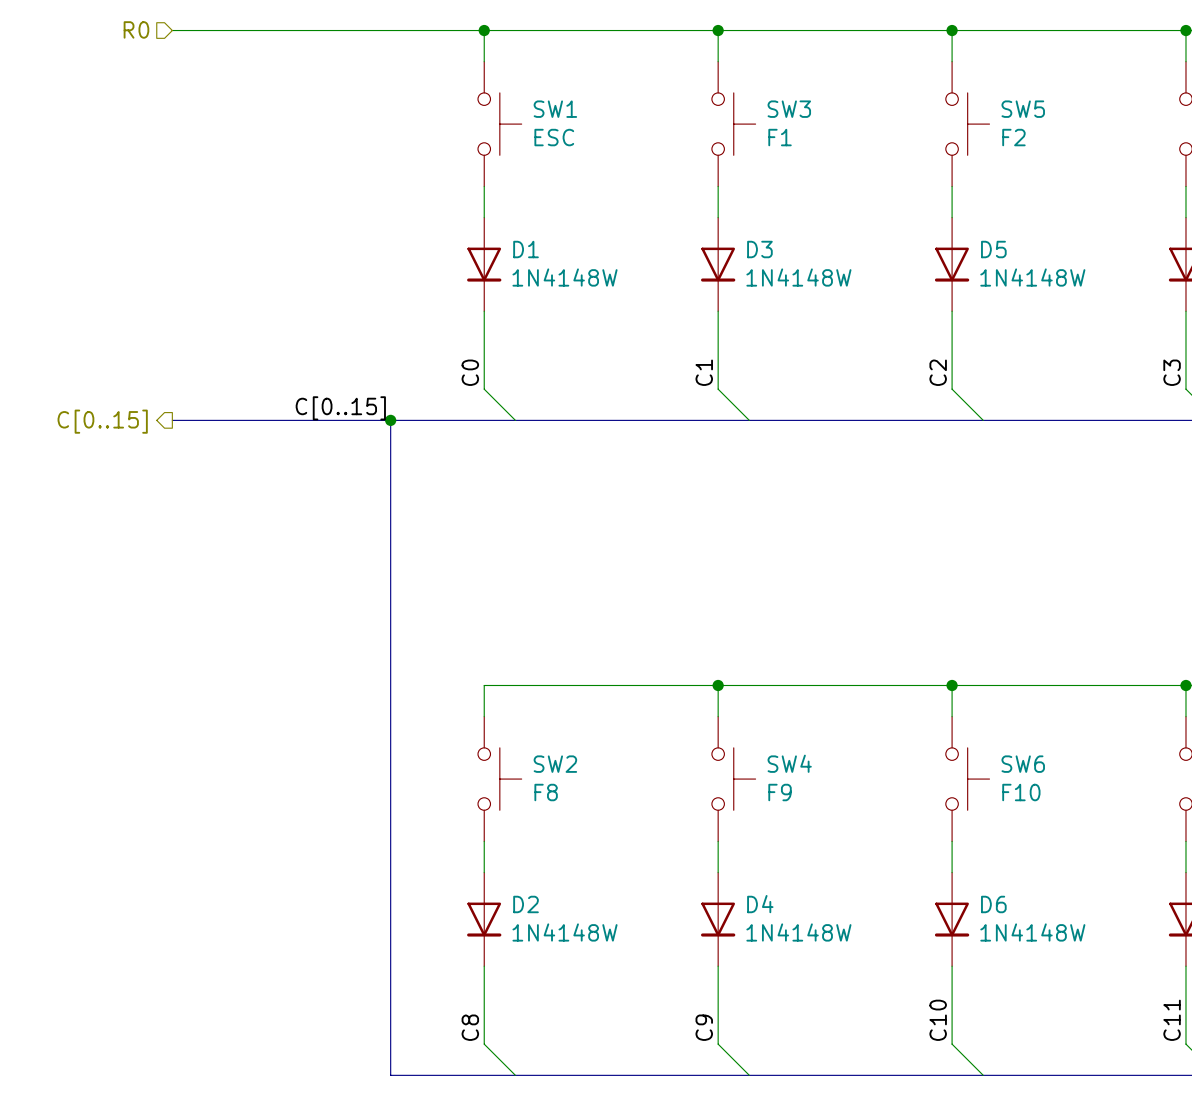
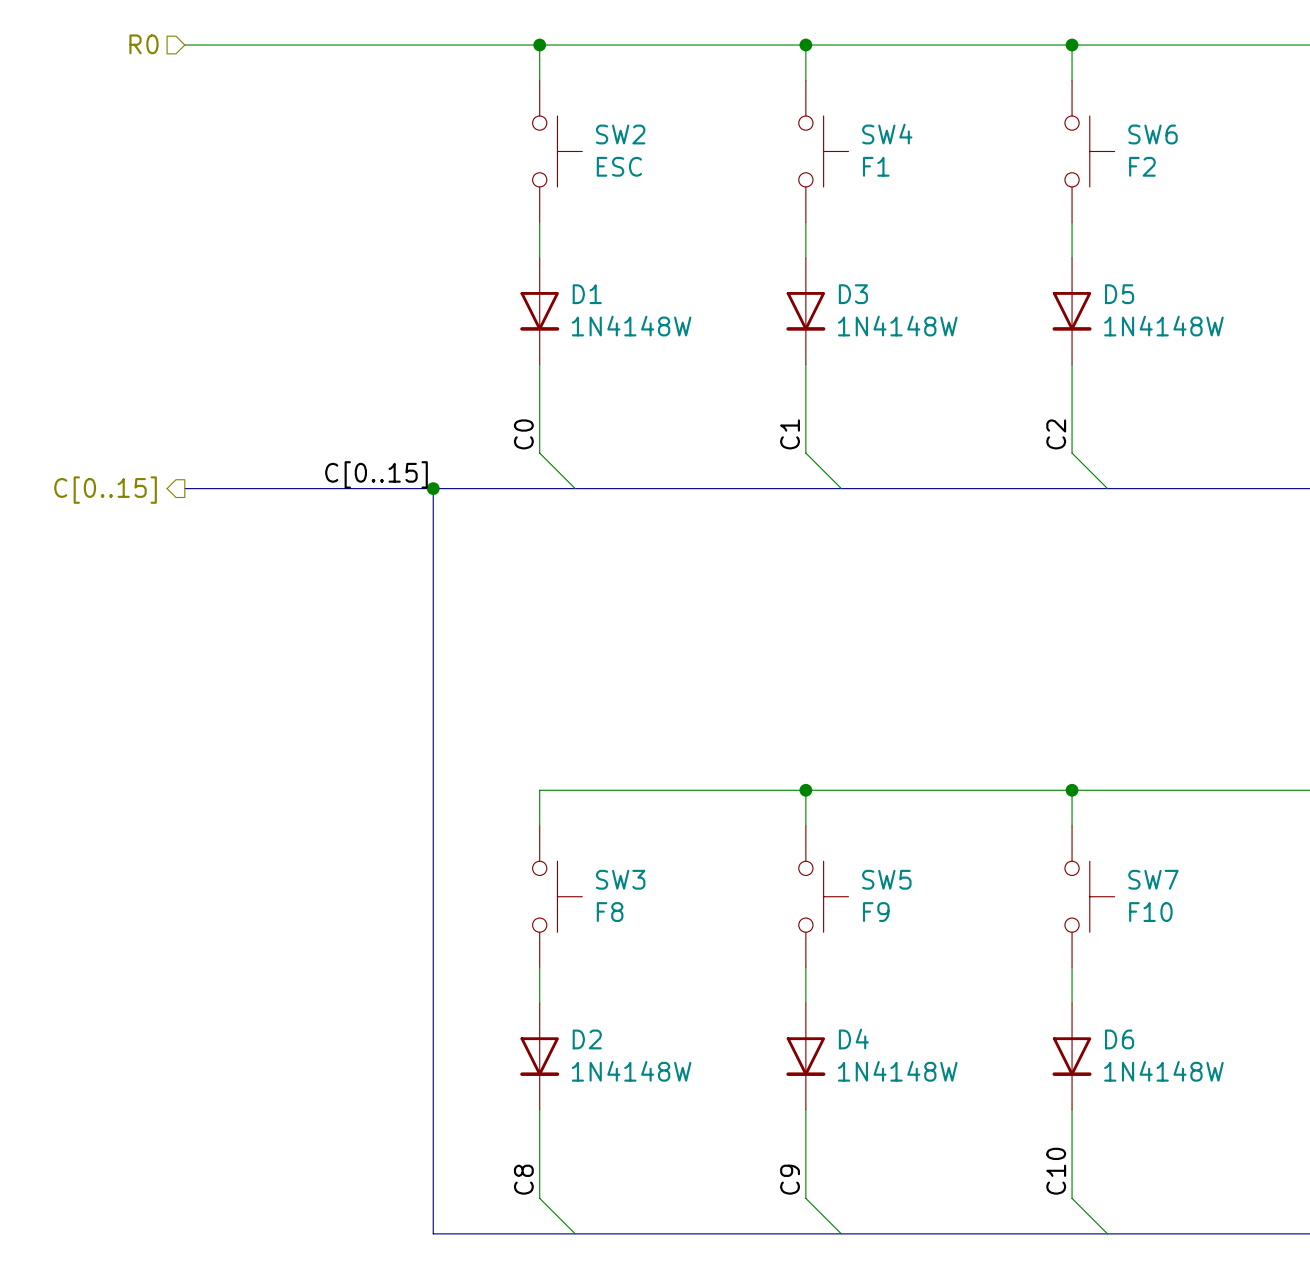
SW1 name: SW1 (555, 109) -> SW2 (620, 134)
SW3 name: SW3 (789, 109) -> SW4 (887, 134)
SW5 name: SW5 (1023, 109) -> SW6 (1153, 134)
SW4 name: SW4 (789, 763) -> SW5 (886, 879)
SW2 name: SW2 (555, 764) -> SW3 (620, 879)
SW6 name: SW6 (1023, 764) -> SW7 (1153, 879)

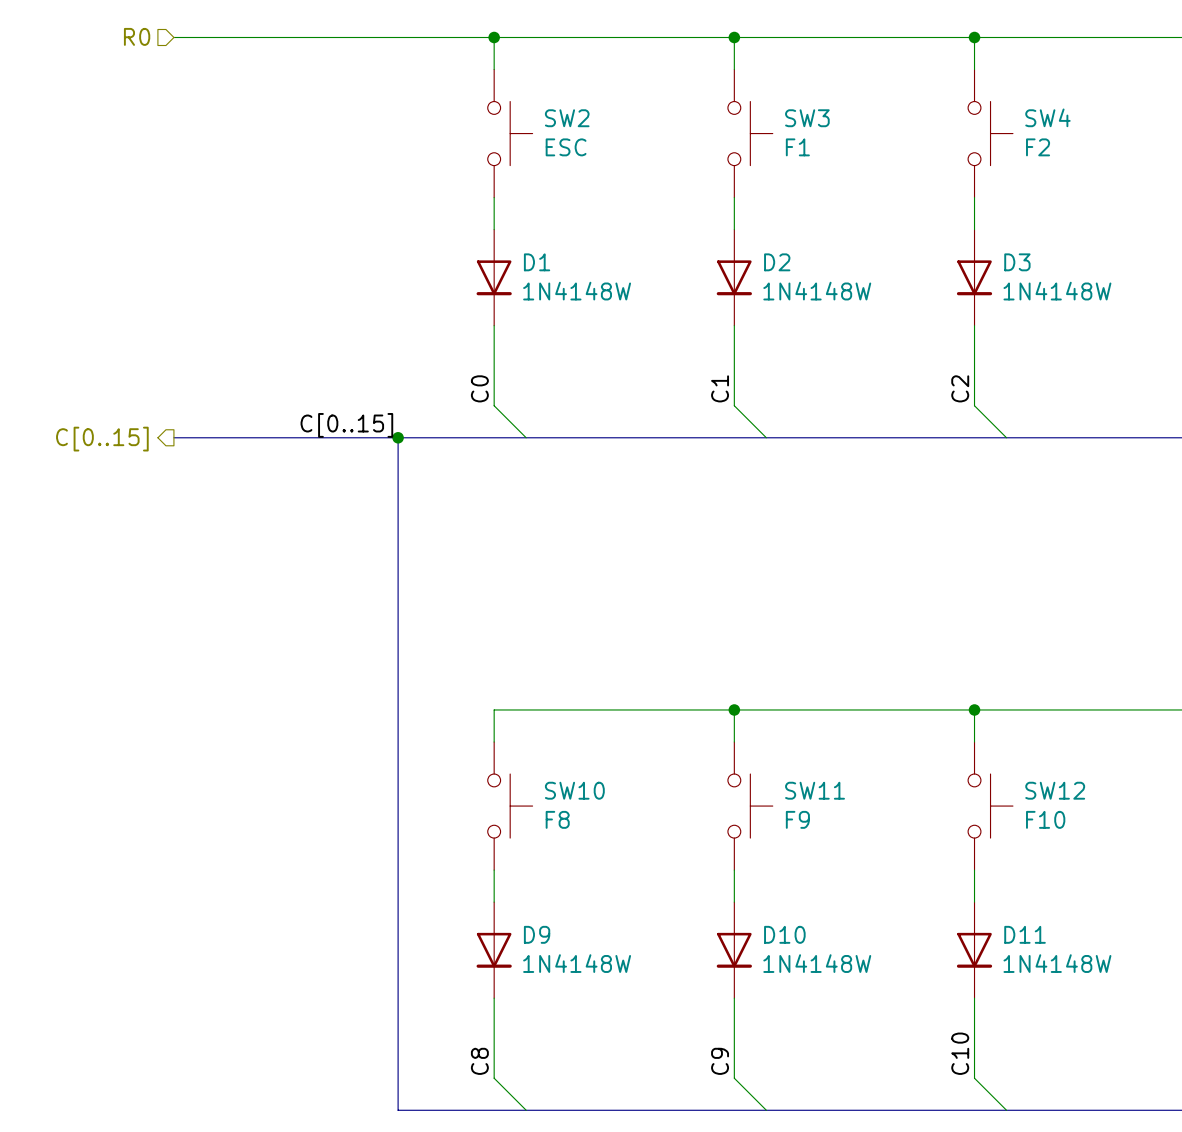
SW4 name: SW4 (887, 134) -> SW3 (807, 118)
SW6 name: SW6 (1153, 134) -> SW4 (1047, 117)
D3 name: D3 (853, 294) -> D2 (777, 262)
D5 name: D5 (1119, 294) -> D3 (1017, 262)
SW3 name: SW3 (620, 879) -> SW10 (574, 790)
SW5 name: SW5 (886, 879) -> SW11 (815, 790)
SW7 name: SW7 (1153, 879) -> SW12 (1055, 790)
D2 name: D2 (587, 1039) -> D9 (537, 934)
D4 name: D4 (853, 1039) -> D10 (784, 934)
D6 name: D6 (1119, 1039) -> D11 (1025, 934)

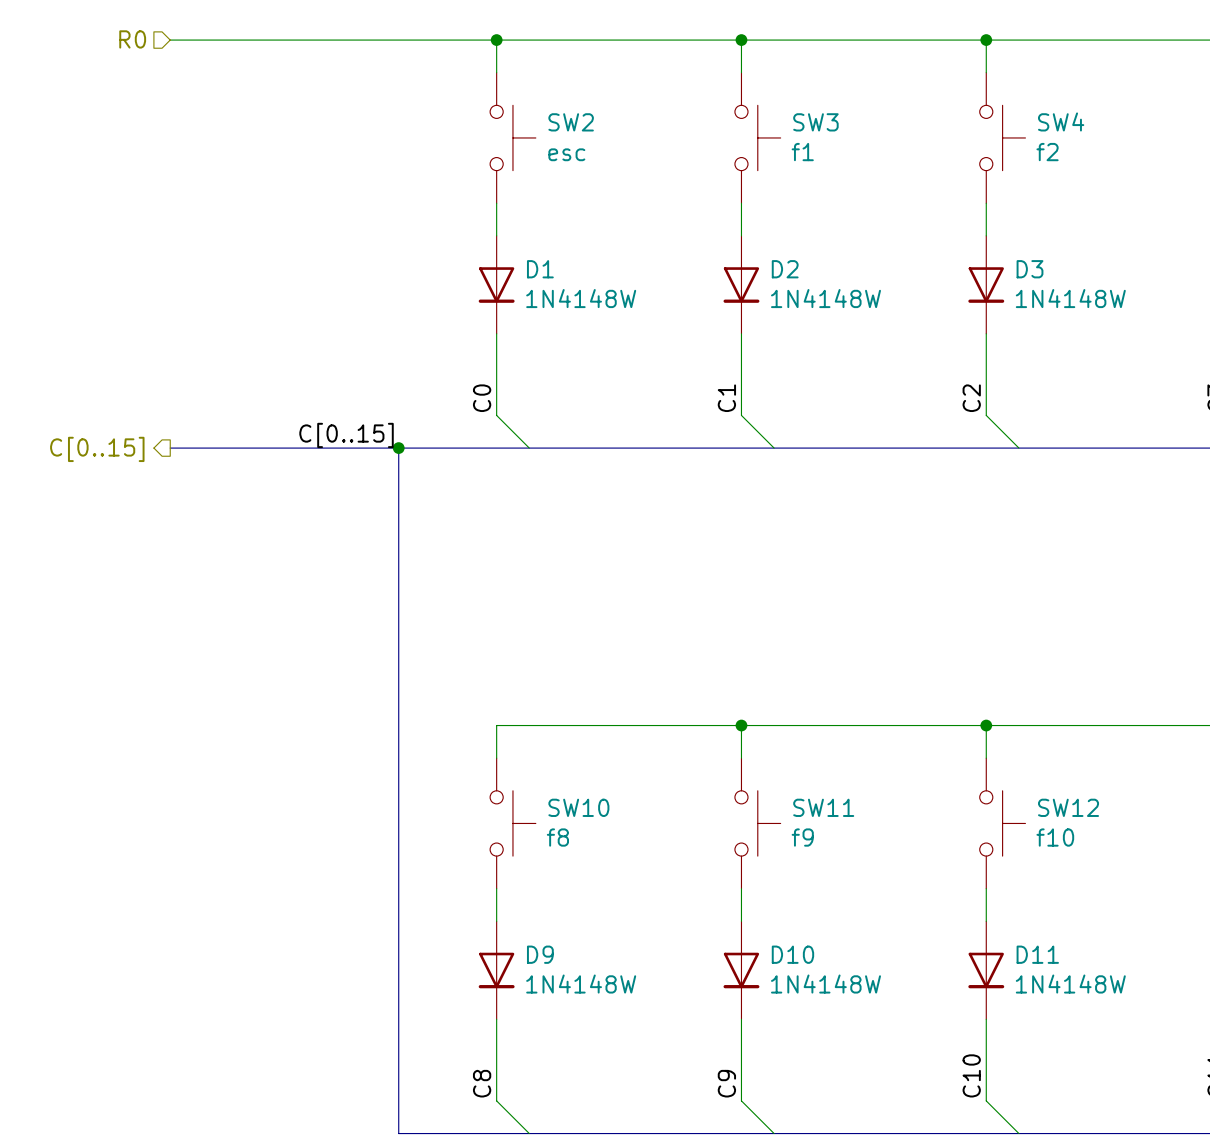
SW2 value: ESC (566, 147) -> esc (566, 154)
SW3 value: F1 (797, 147) -> f1 (802, 152)
SW4 value: F2 (1038, 147) -> f2 (1047, 152)
SW10 value: F8 (557, 819) -> f8 (557, 837)
SW11 value: F9 (797, 819) -> f9 (802, 837)
SW12 value: F10 (1045, 819) -> f10 (1055, 837)

